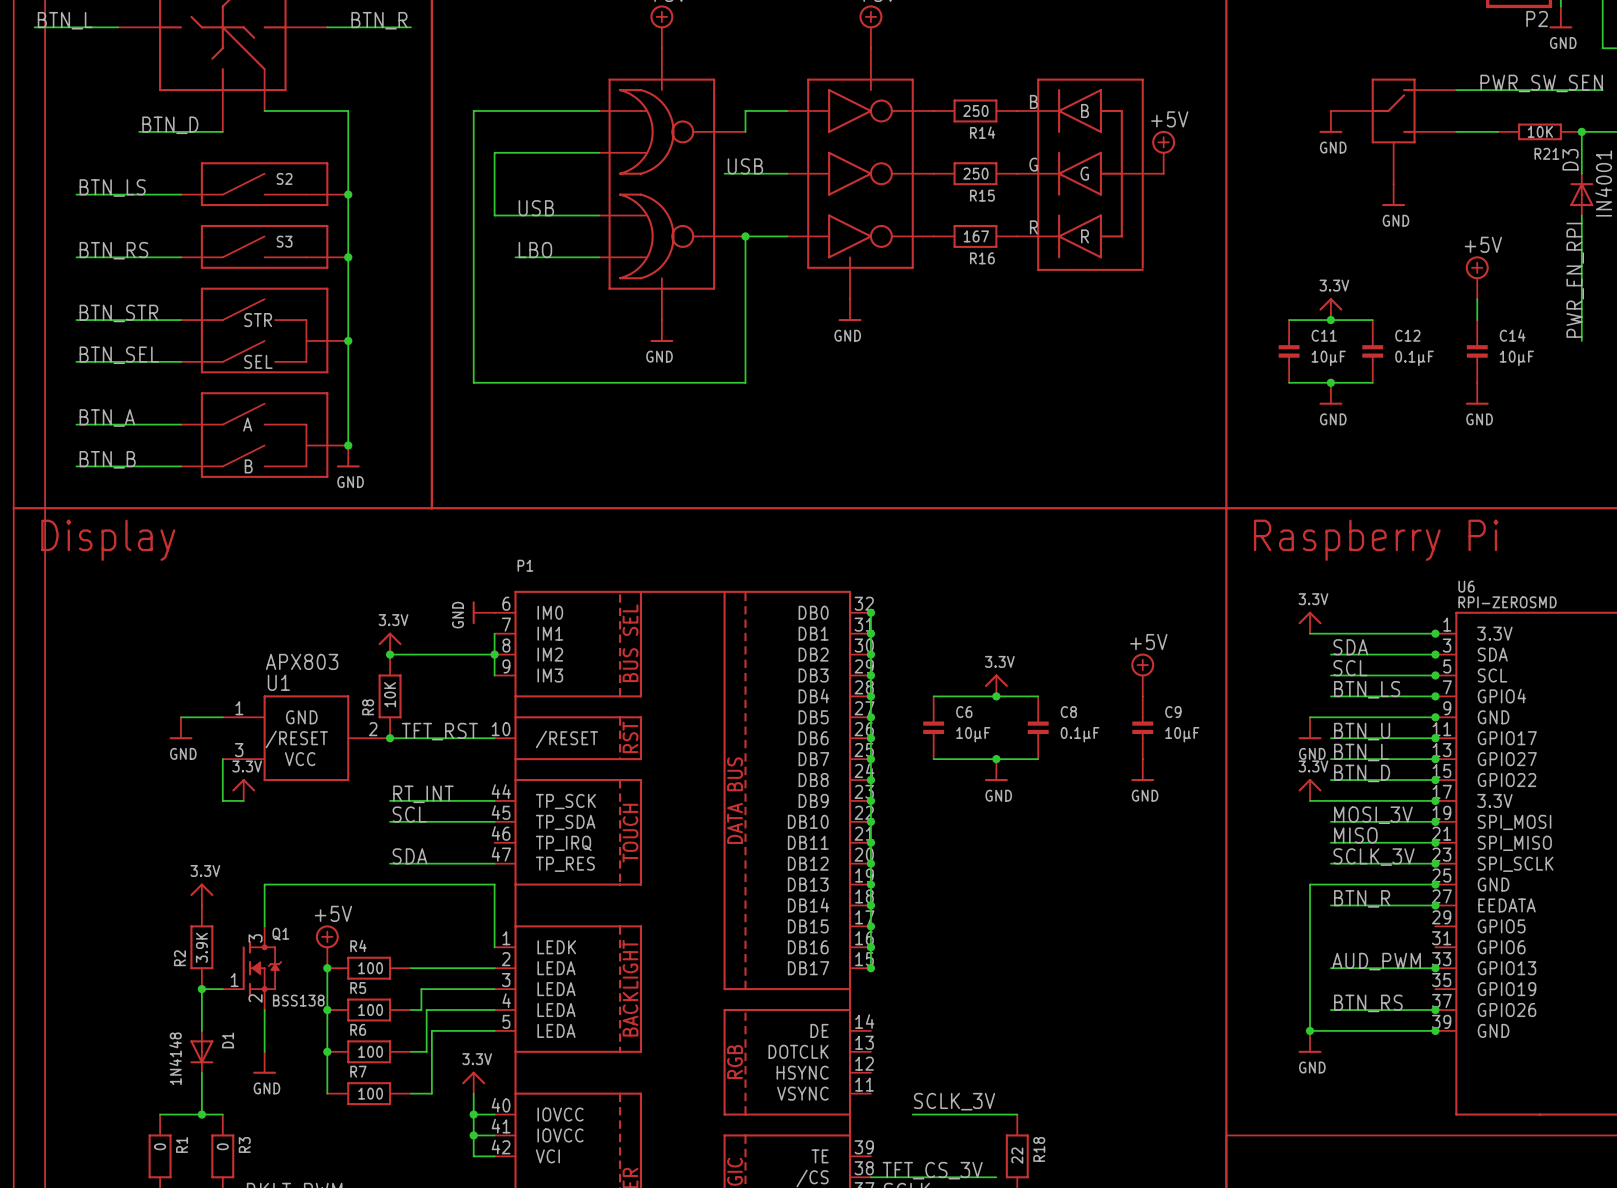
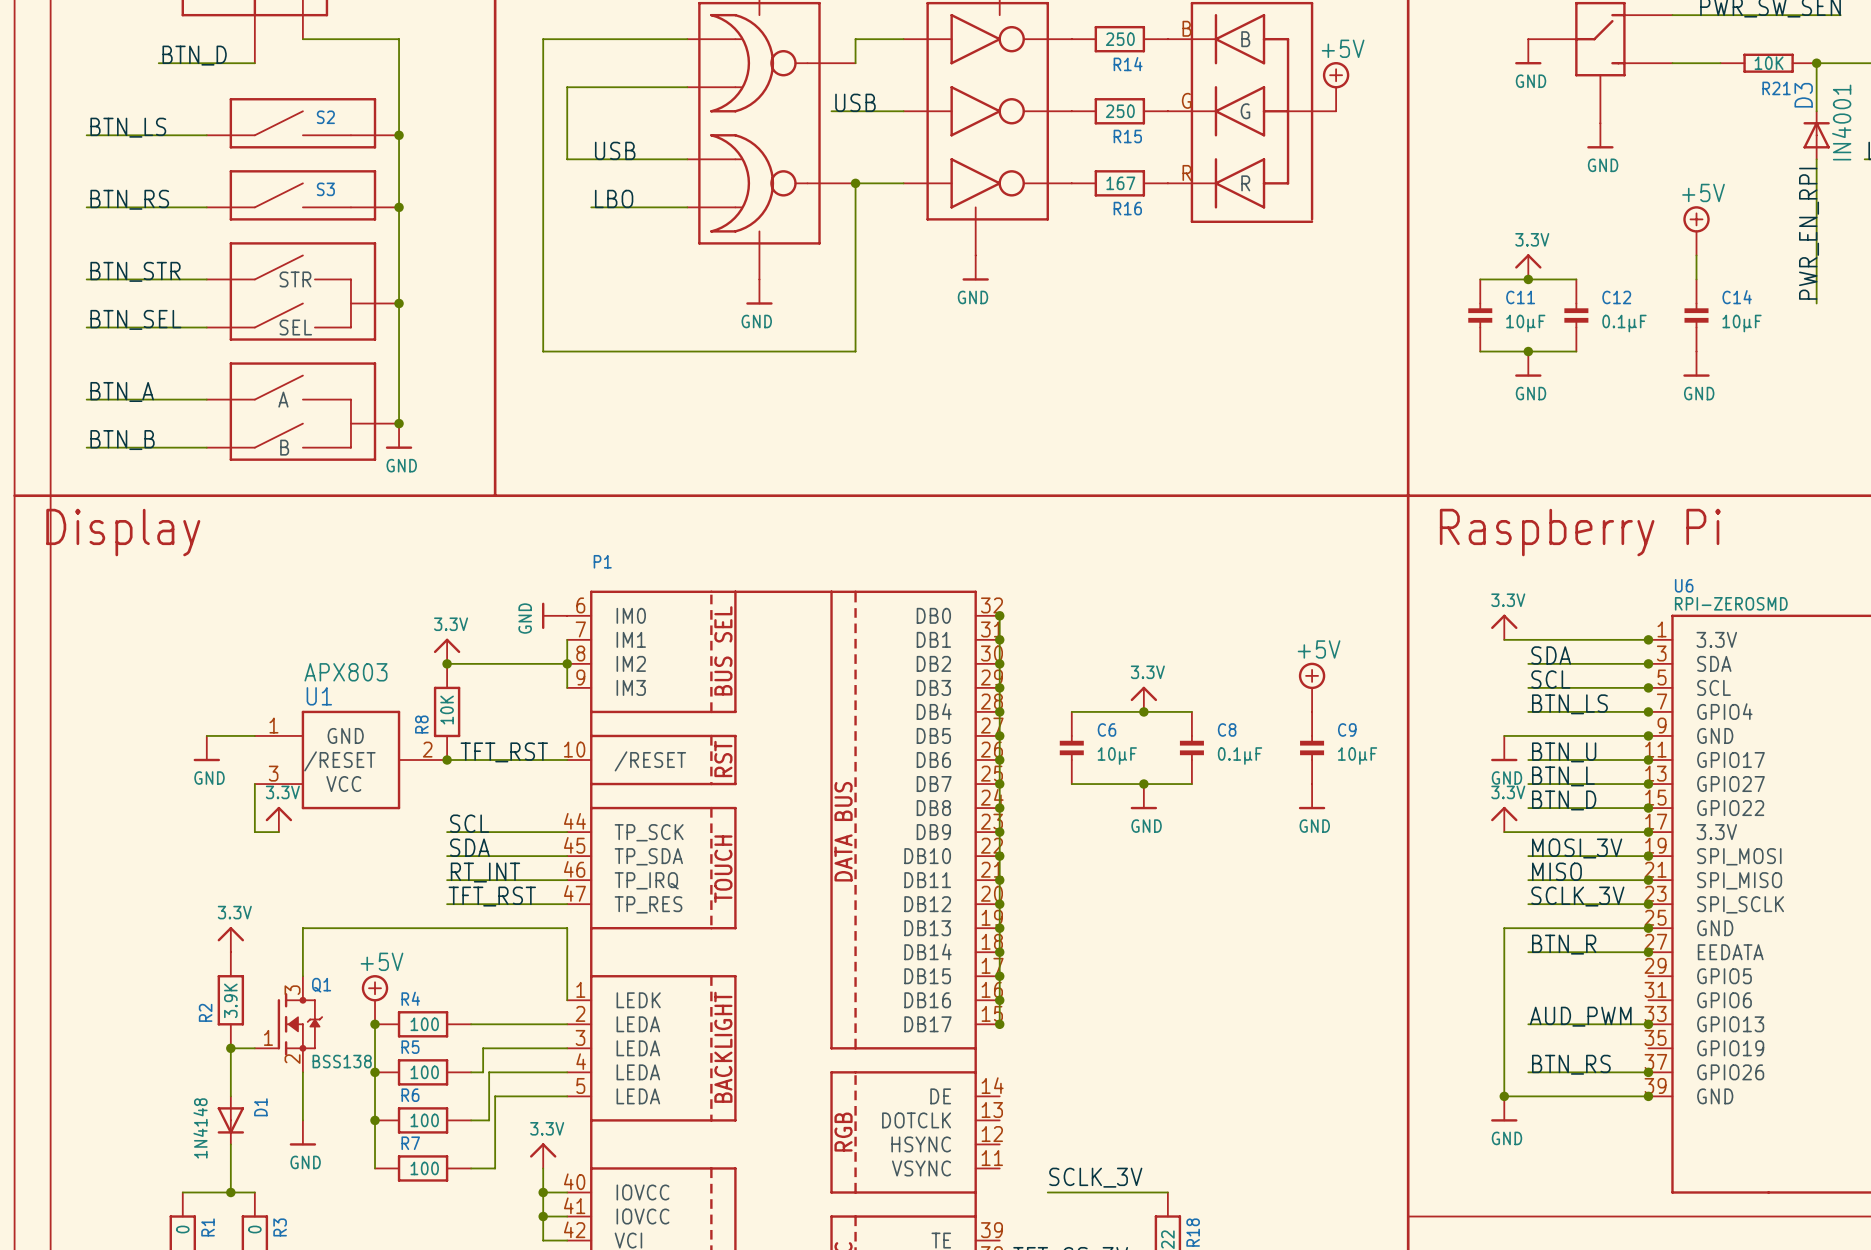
label: RT_INT (423, 794) -> SCL (469, 823)
label: SCL (409, 814) -> SDA (469, 847)
label: none -> RT_INT (485, 872)
wire: none -> (447, 880) (567, 880)
label: SDA (409, 856) -> TFT_RST (492, 896)

